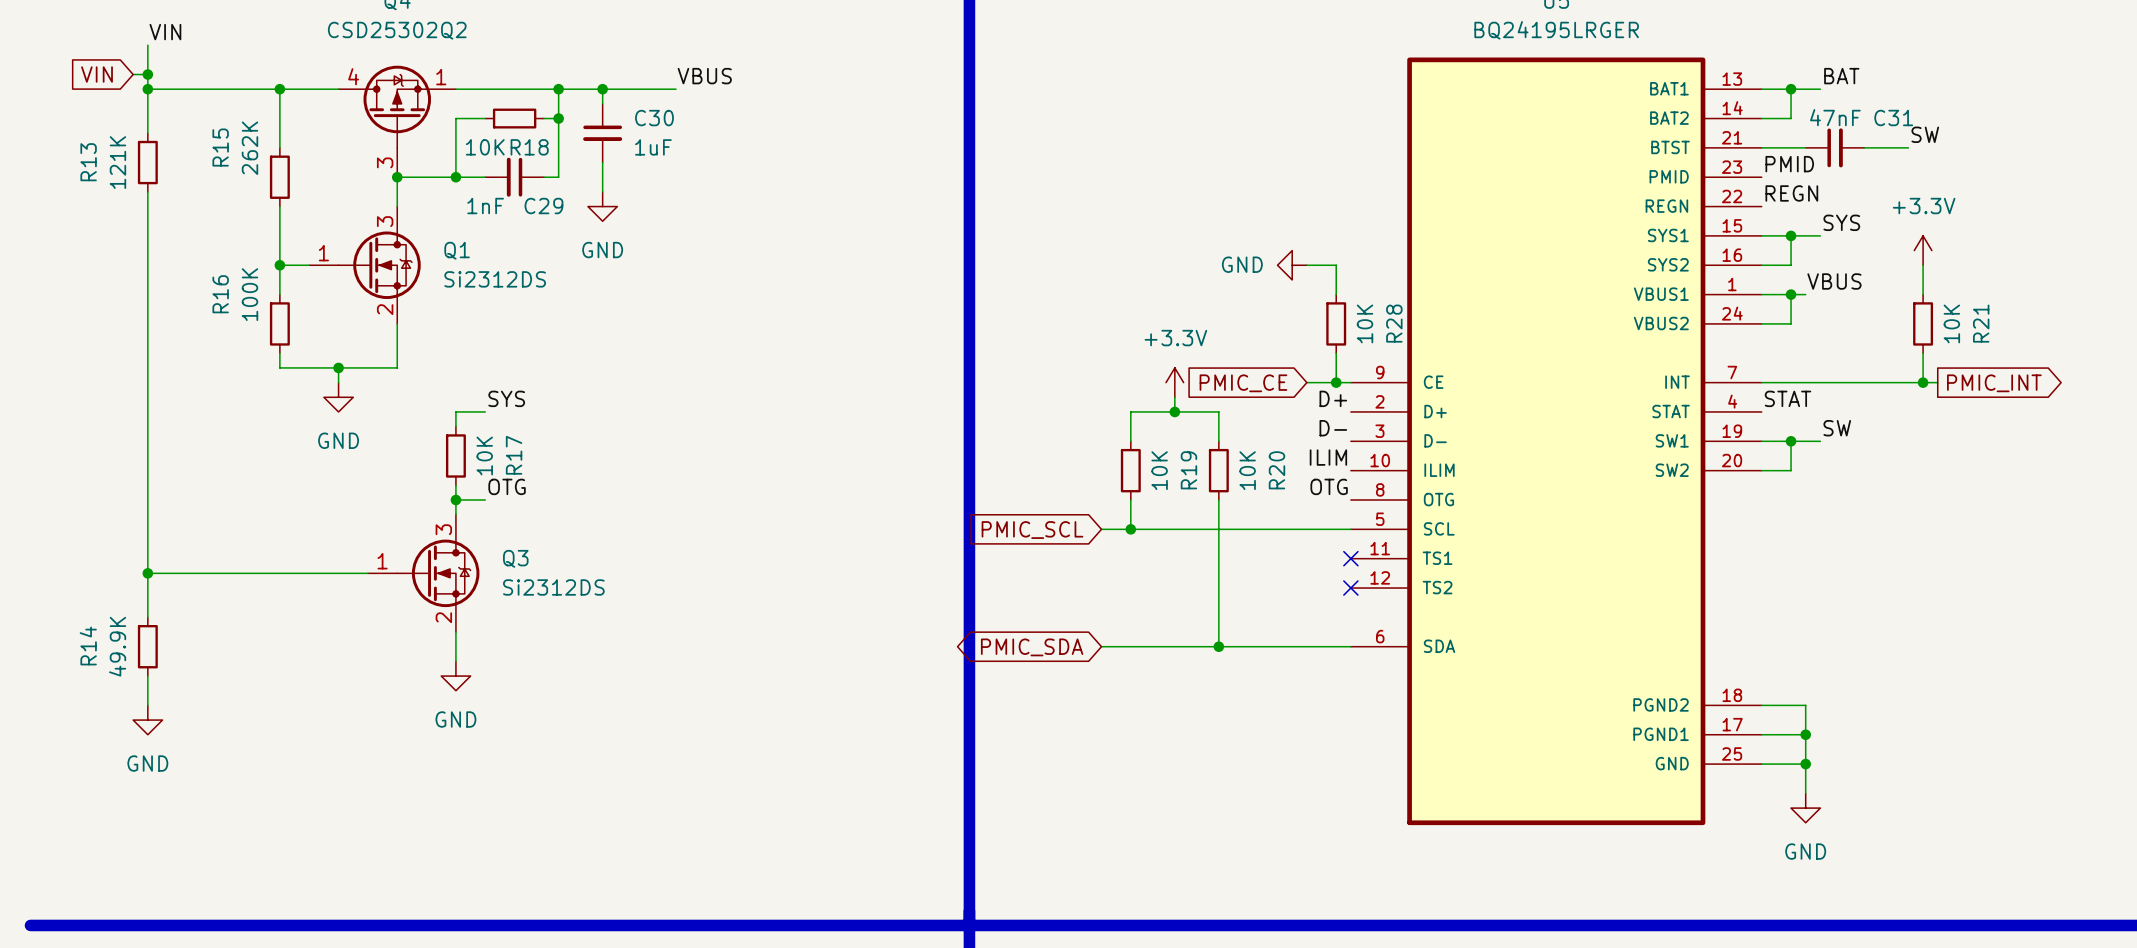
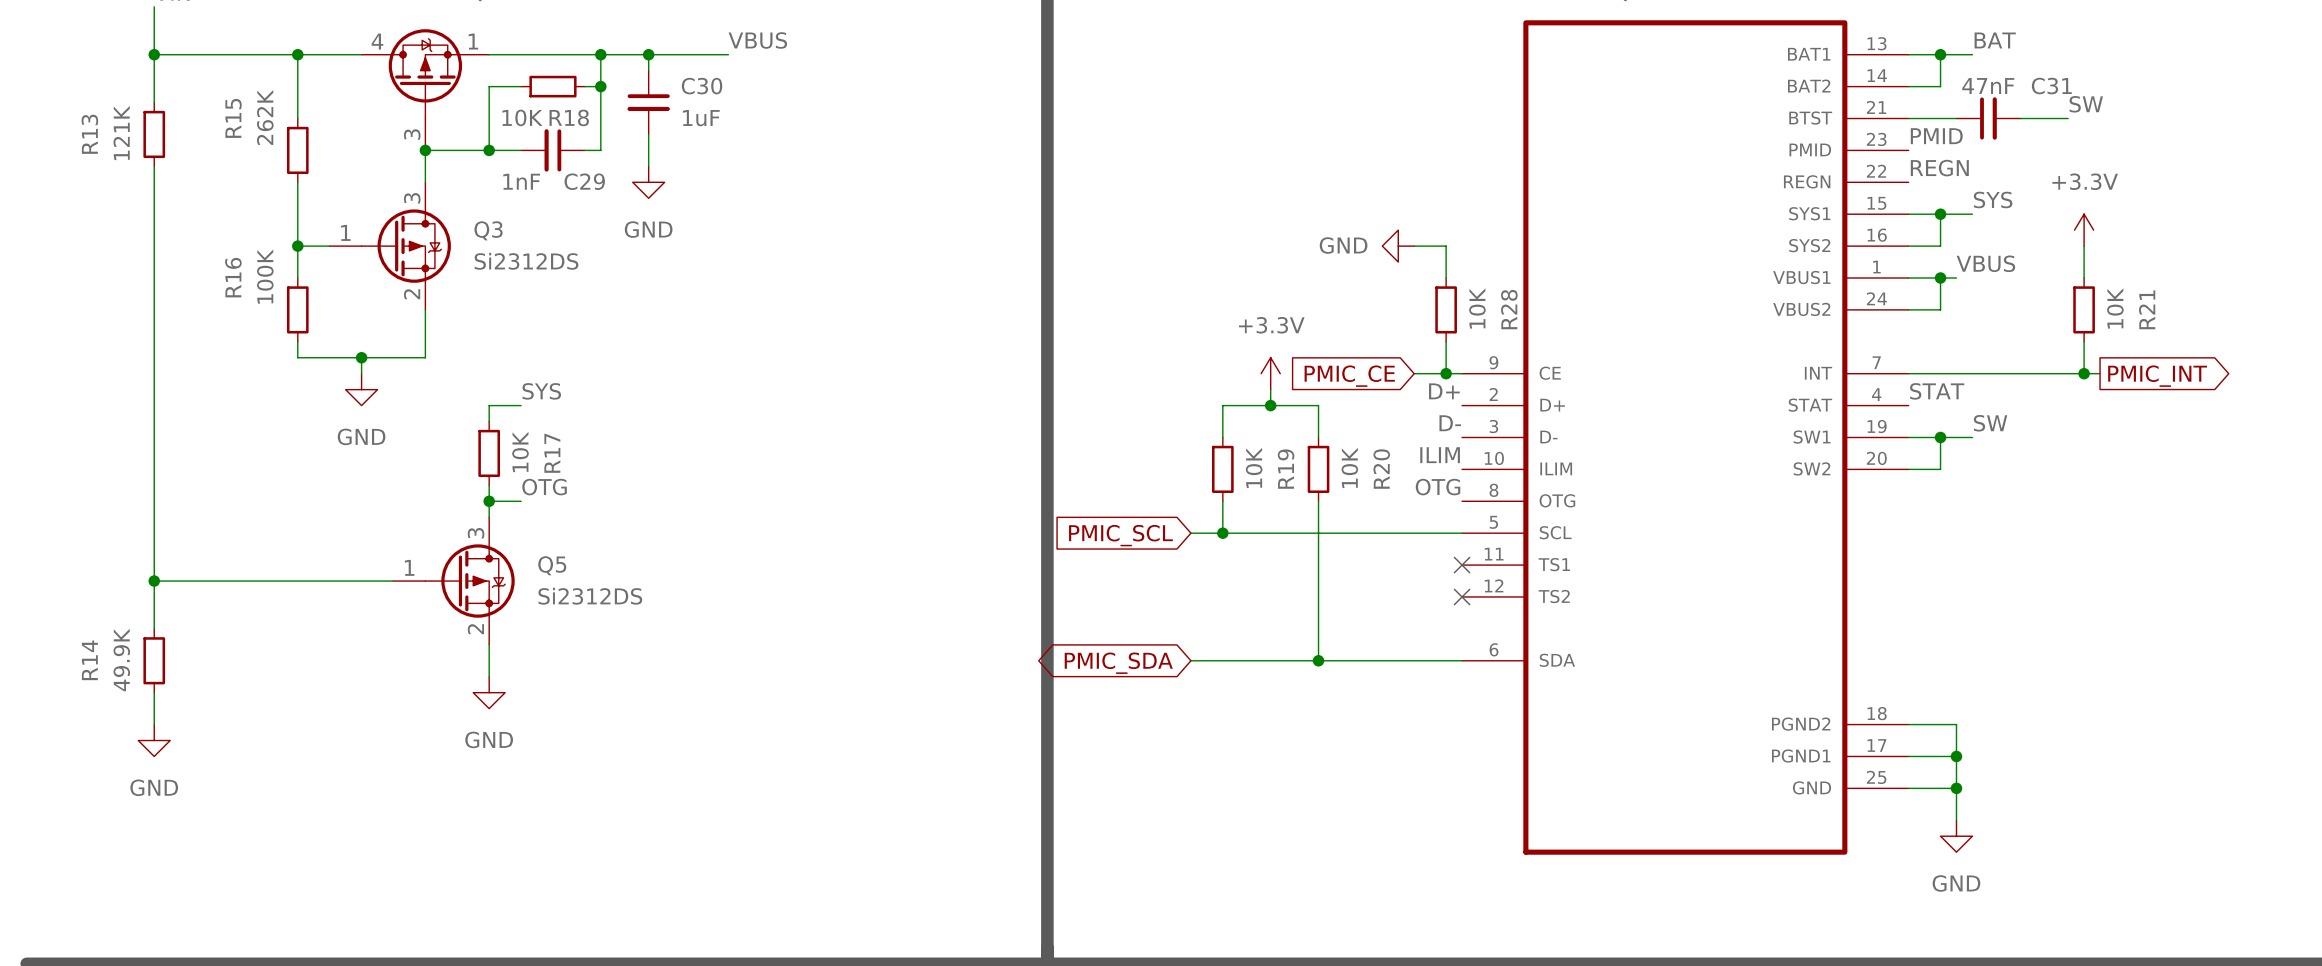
global label: VIN (96, 74) -> none
wire: (133, 74) (147, 74) -> none
junction: (147, 74) -> none
Q1: Si2312DS (364, 265) -> none
Q3 symbol: [367, 514, 480, 633] -> [329, 182, 451, 310]
Q5: none -> Si2312DS (454, 581)

